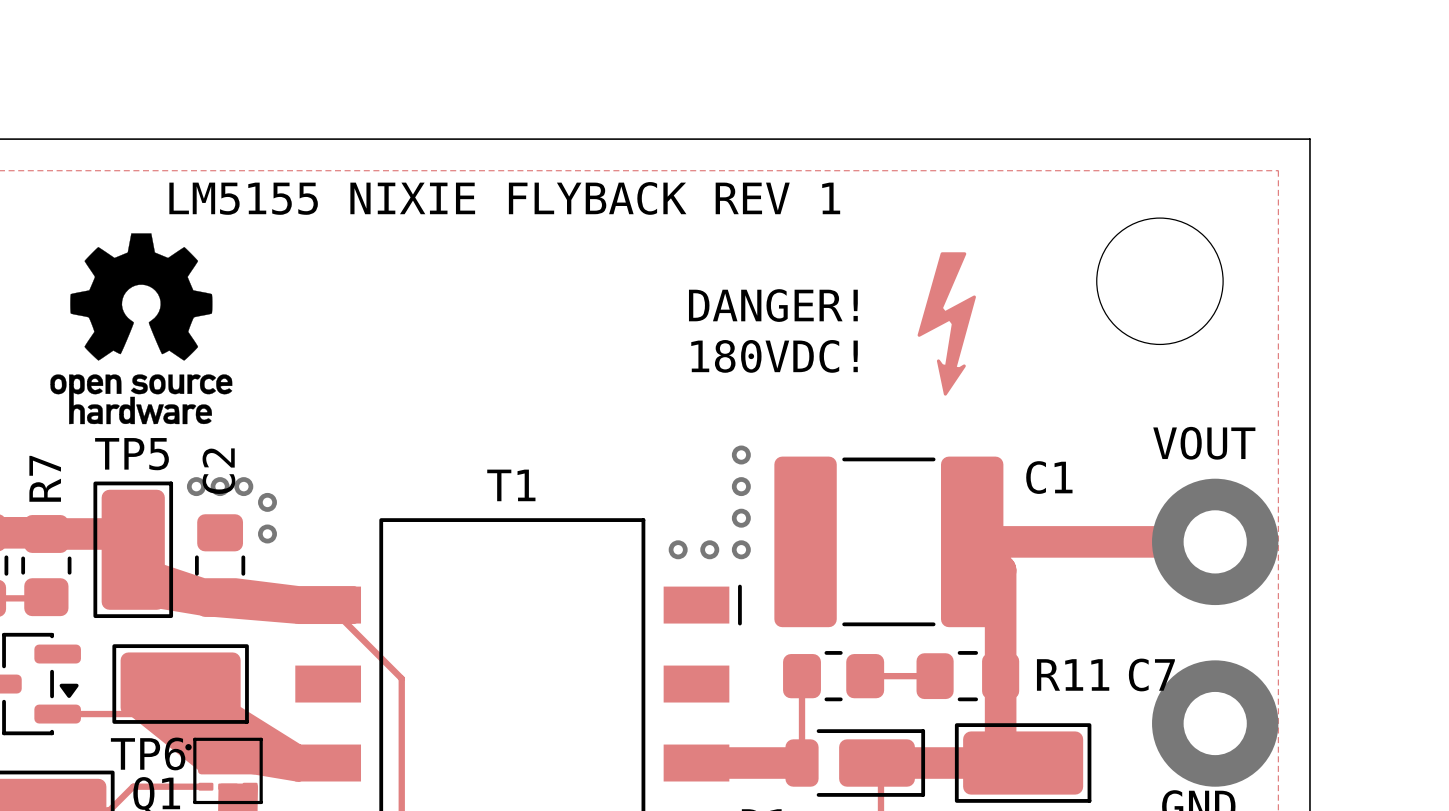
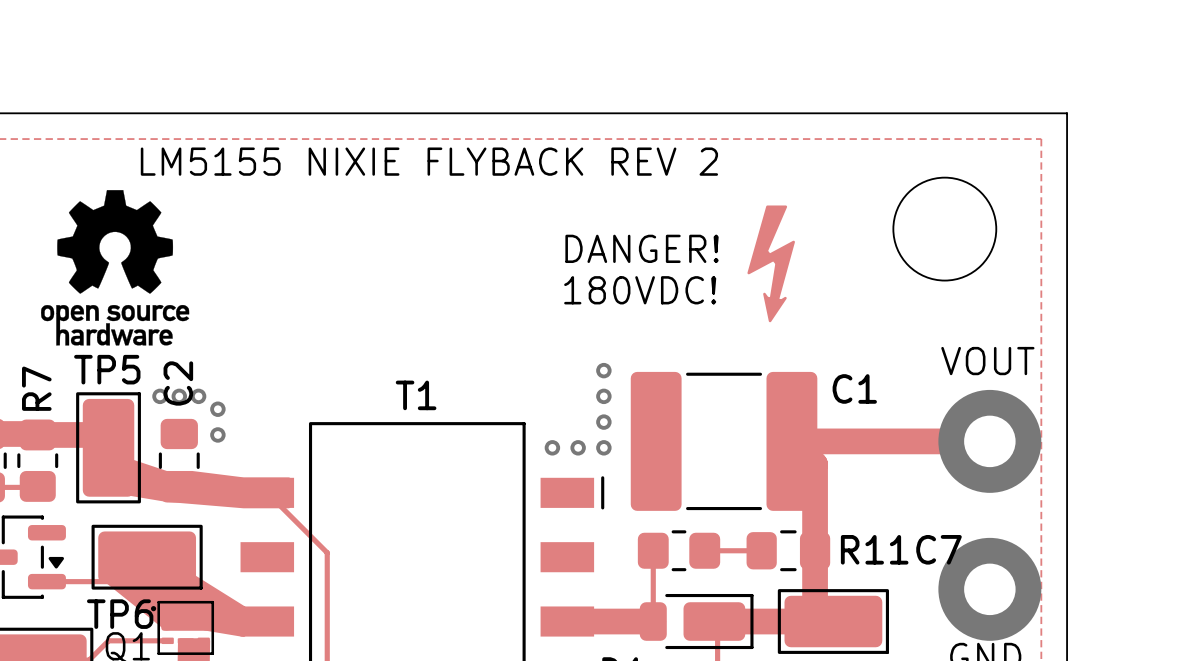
text: LM5155 NIXIE FLYBACK REV 1 (504, 198) -> LM5155 NIXIE FLYBACK REV 2 (429, 161)

